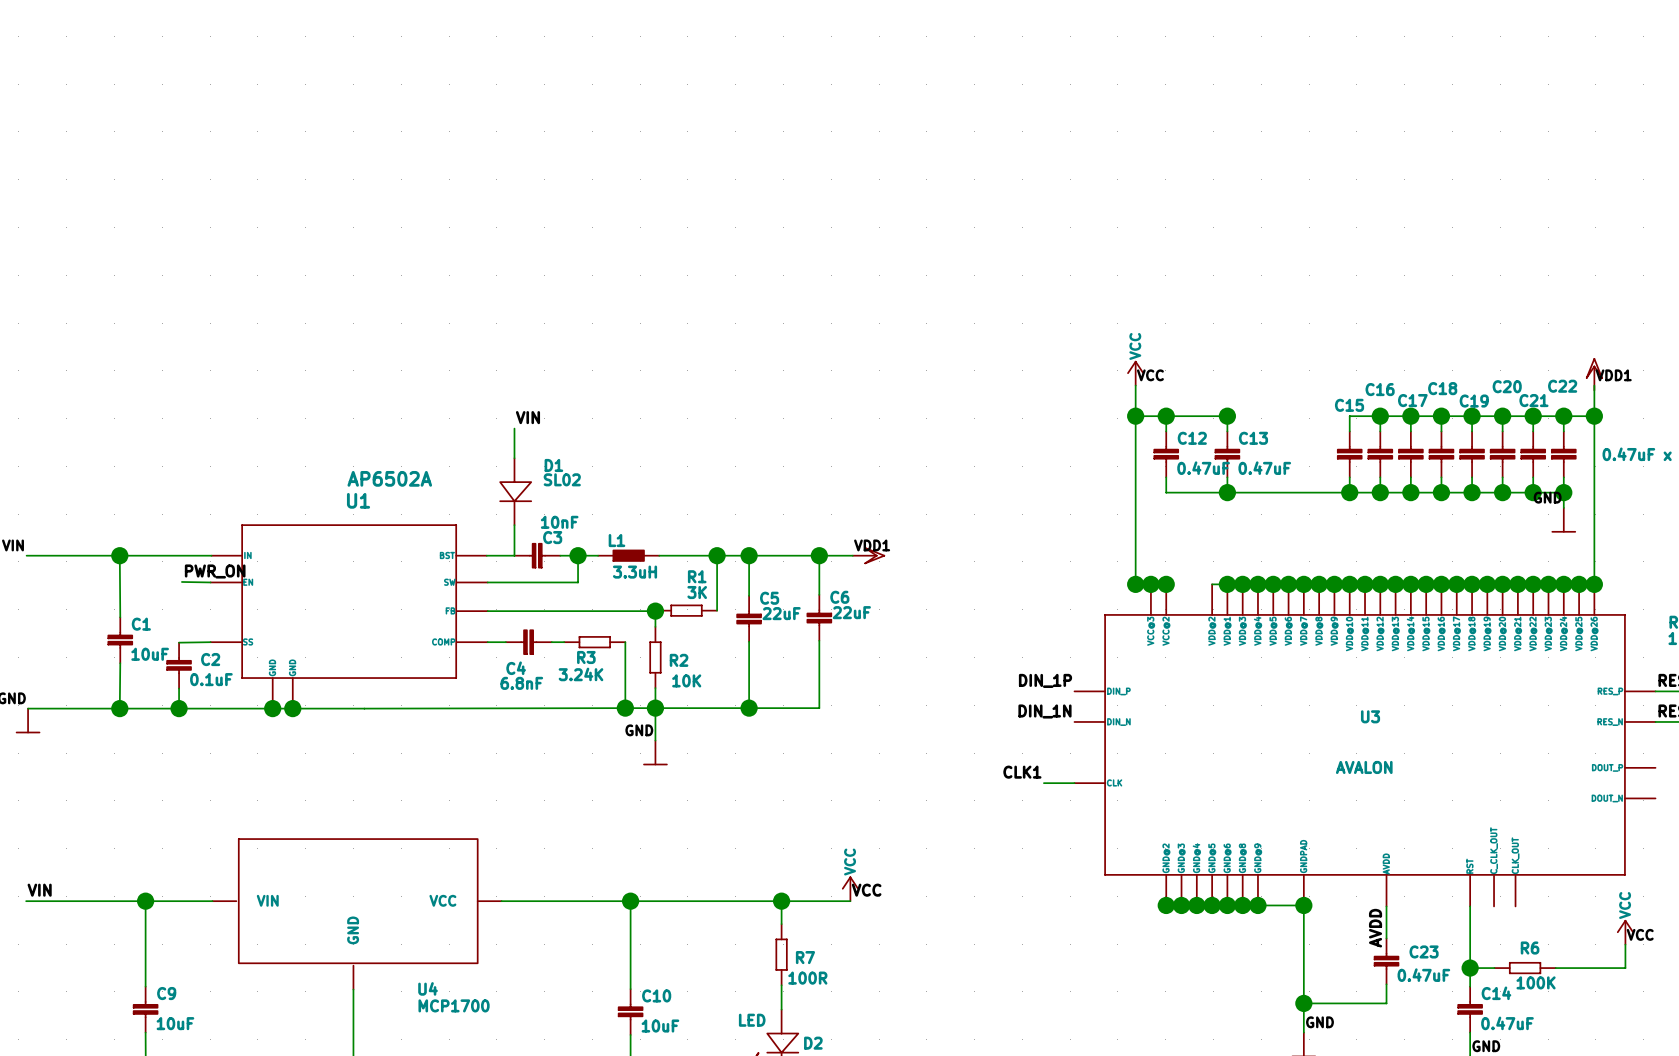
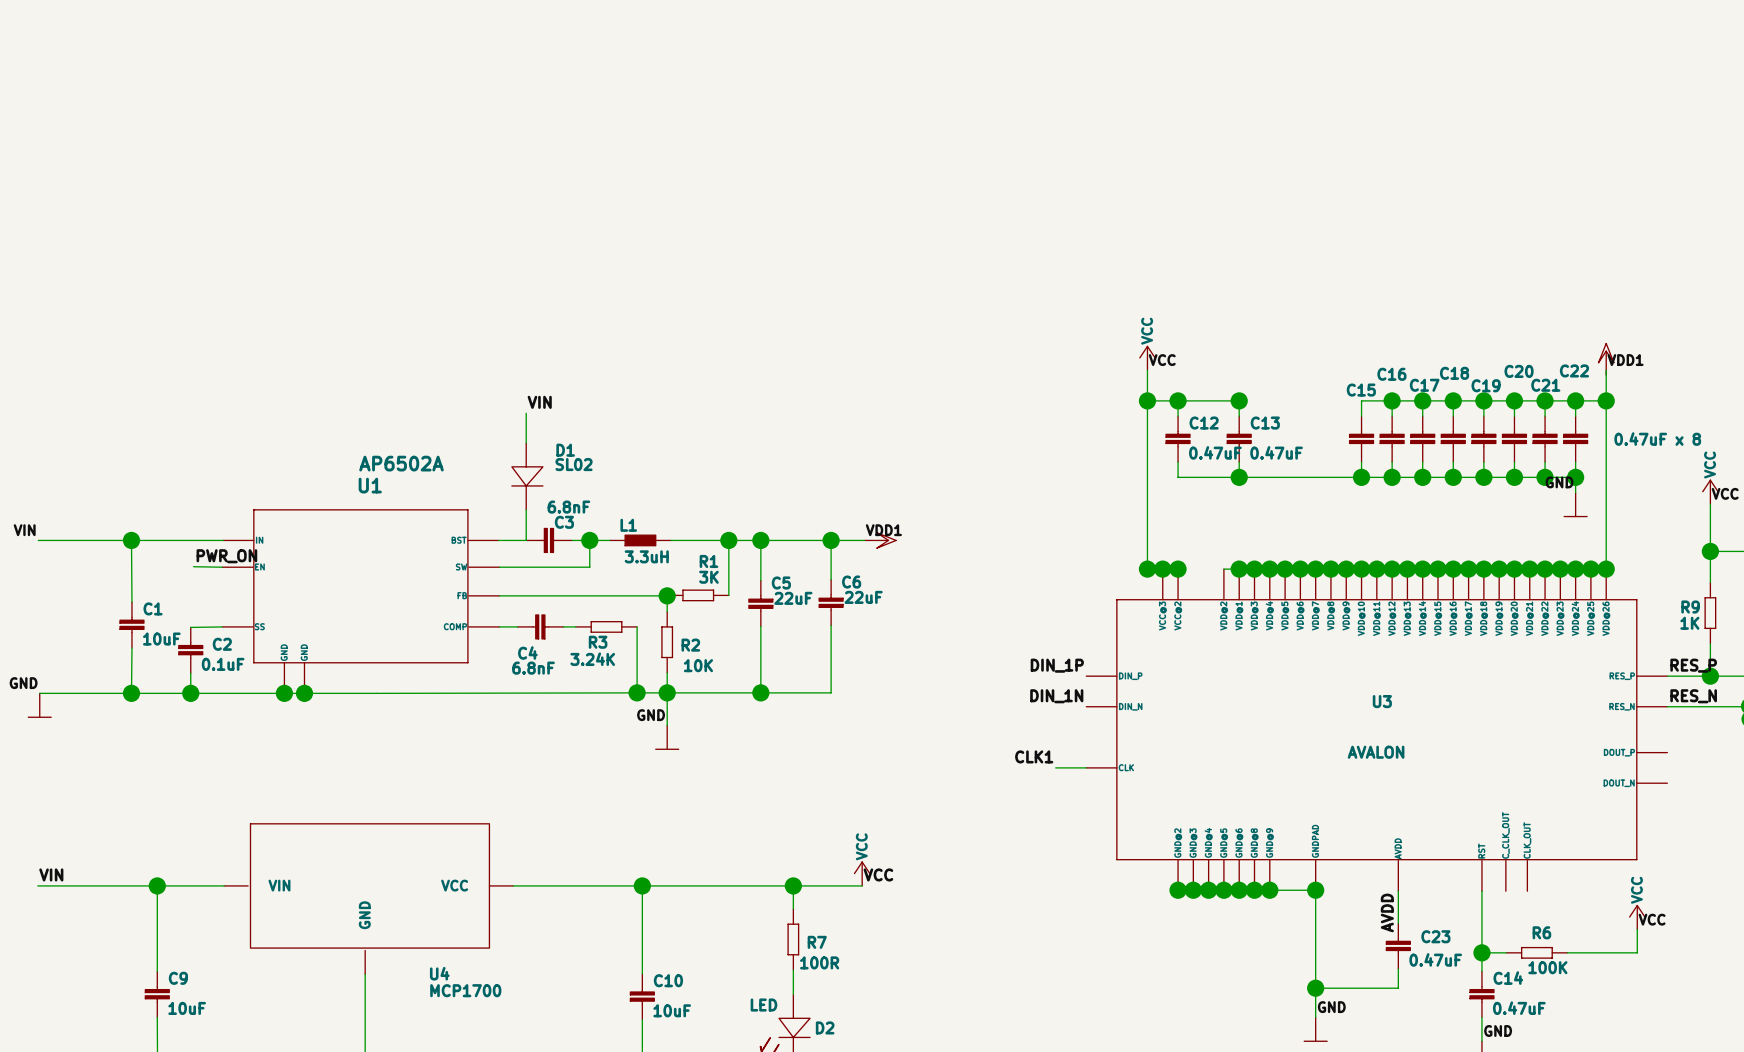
C3 value: 10nF (559, 522) -> 6.8nF (568, 507)

